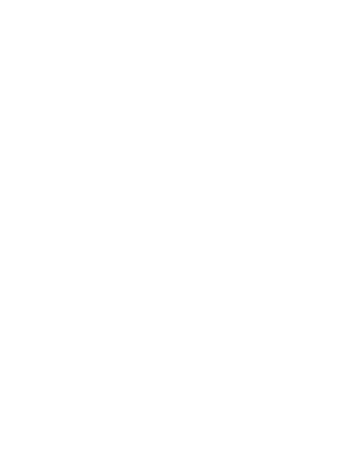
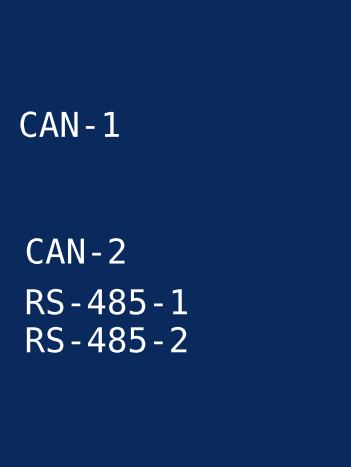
text: none -> CAN-1 (69, 124)
text: none -> CAN-2 (75, 251)
text: none -> RS-485-1 (106, 301)
text: none -> RS-485-2 (106, 339)

